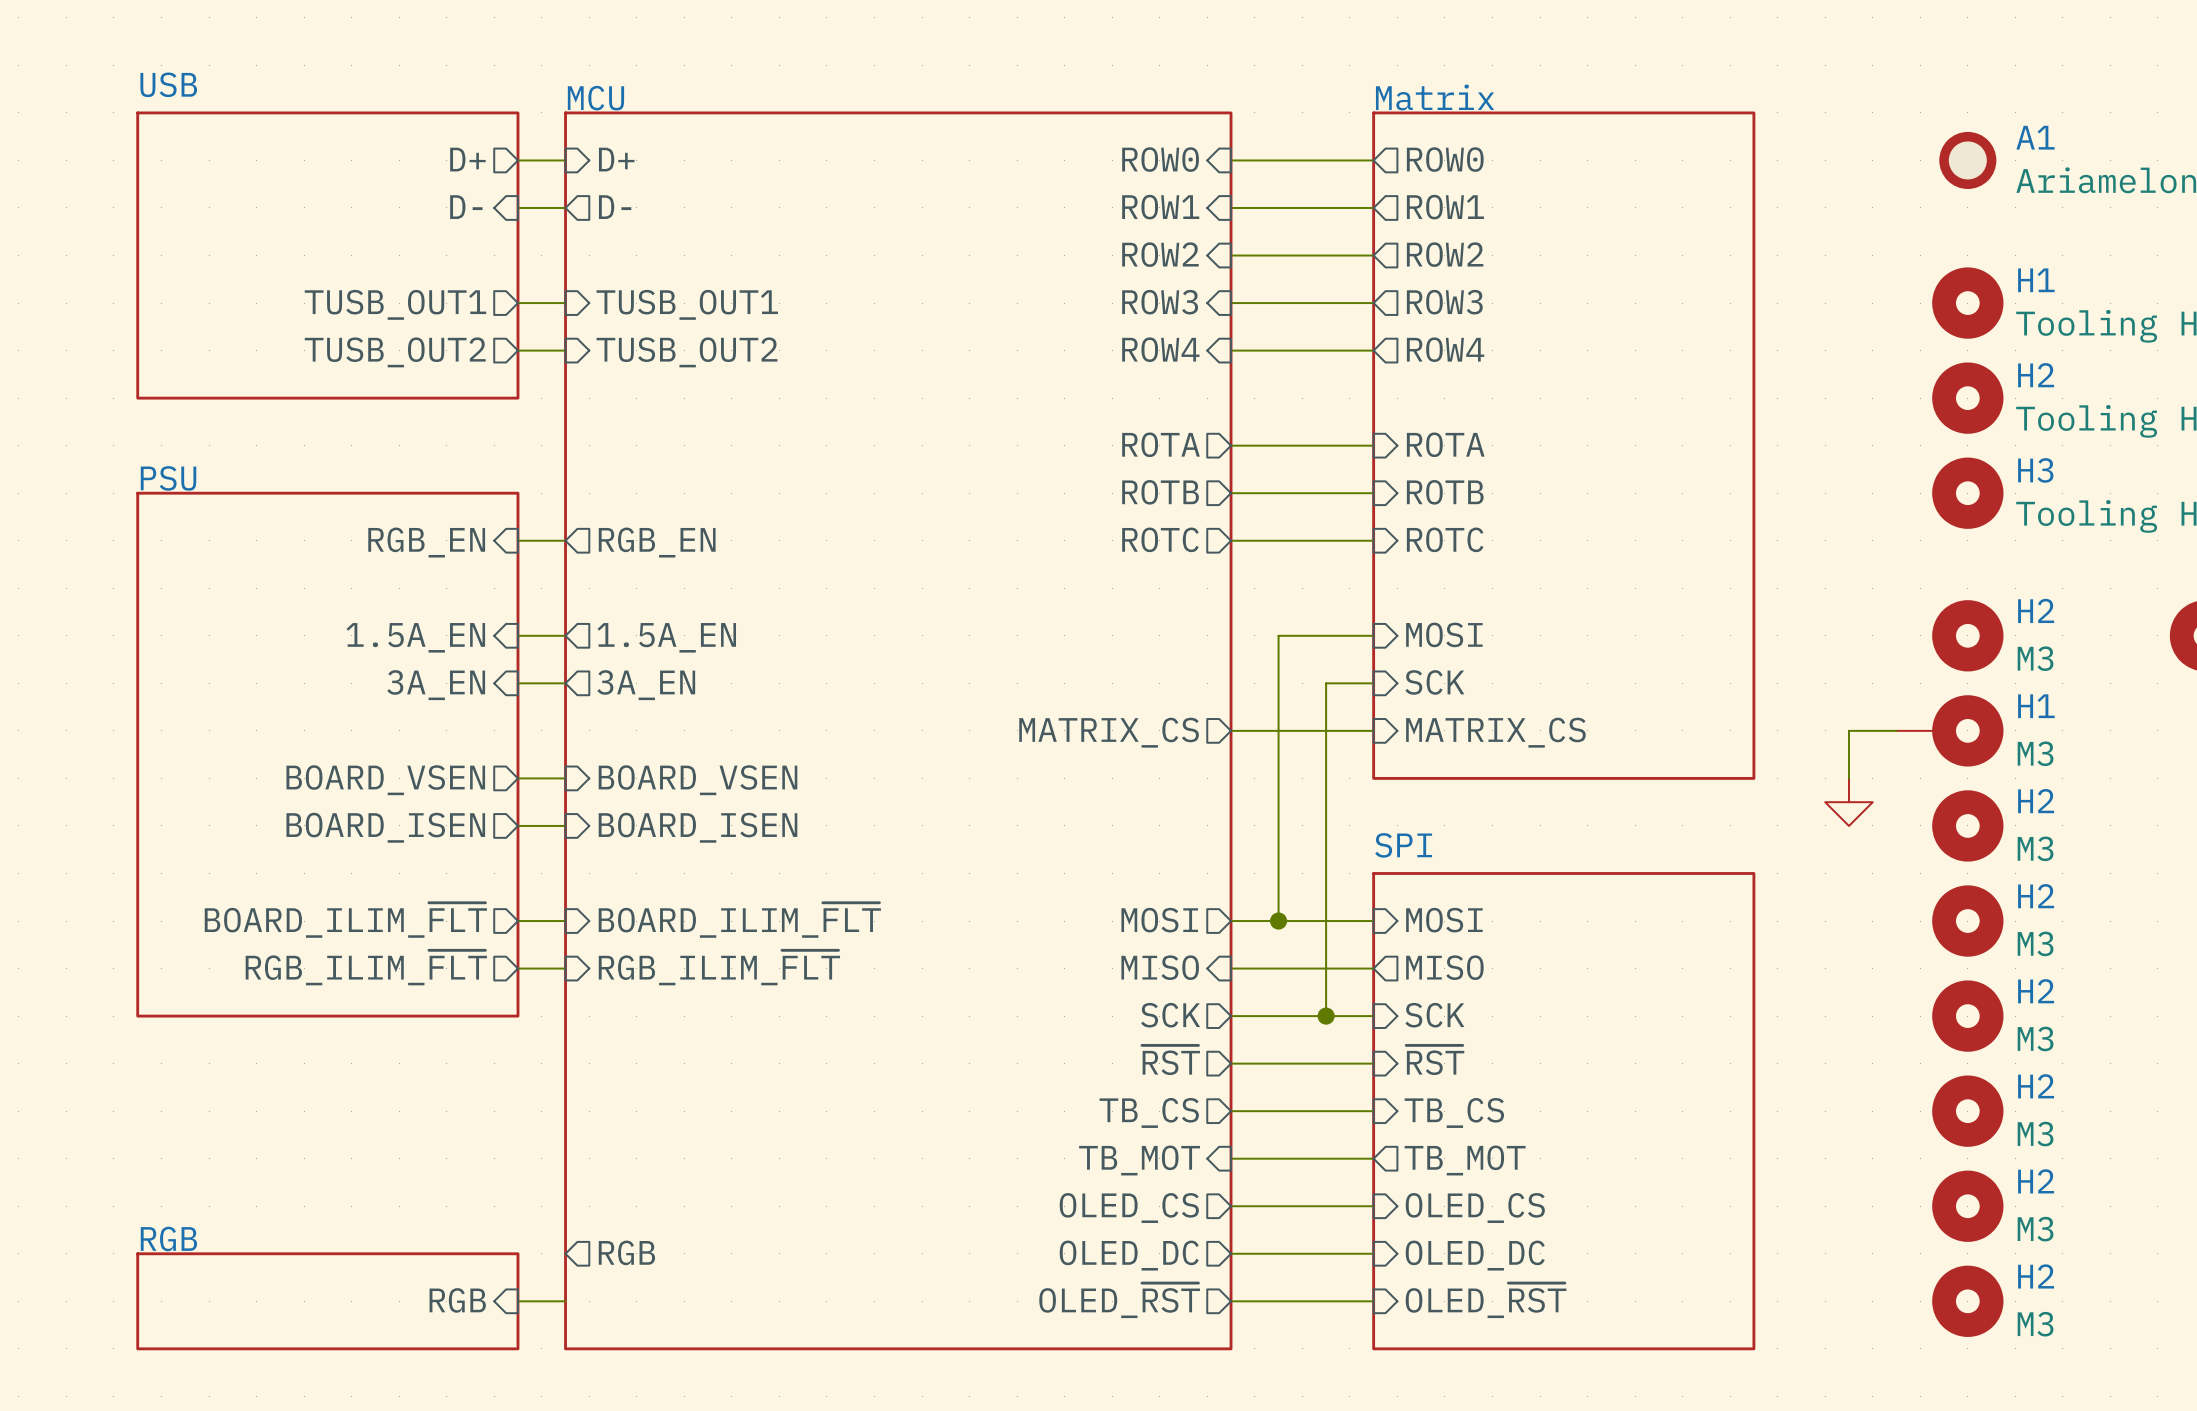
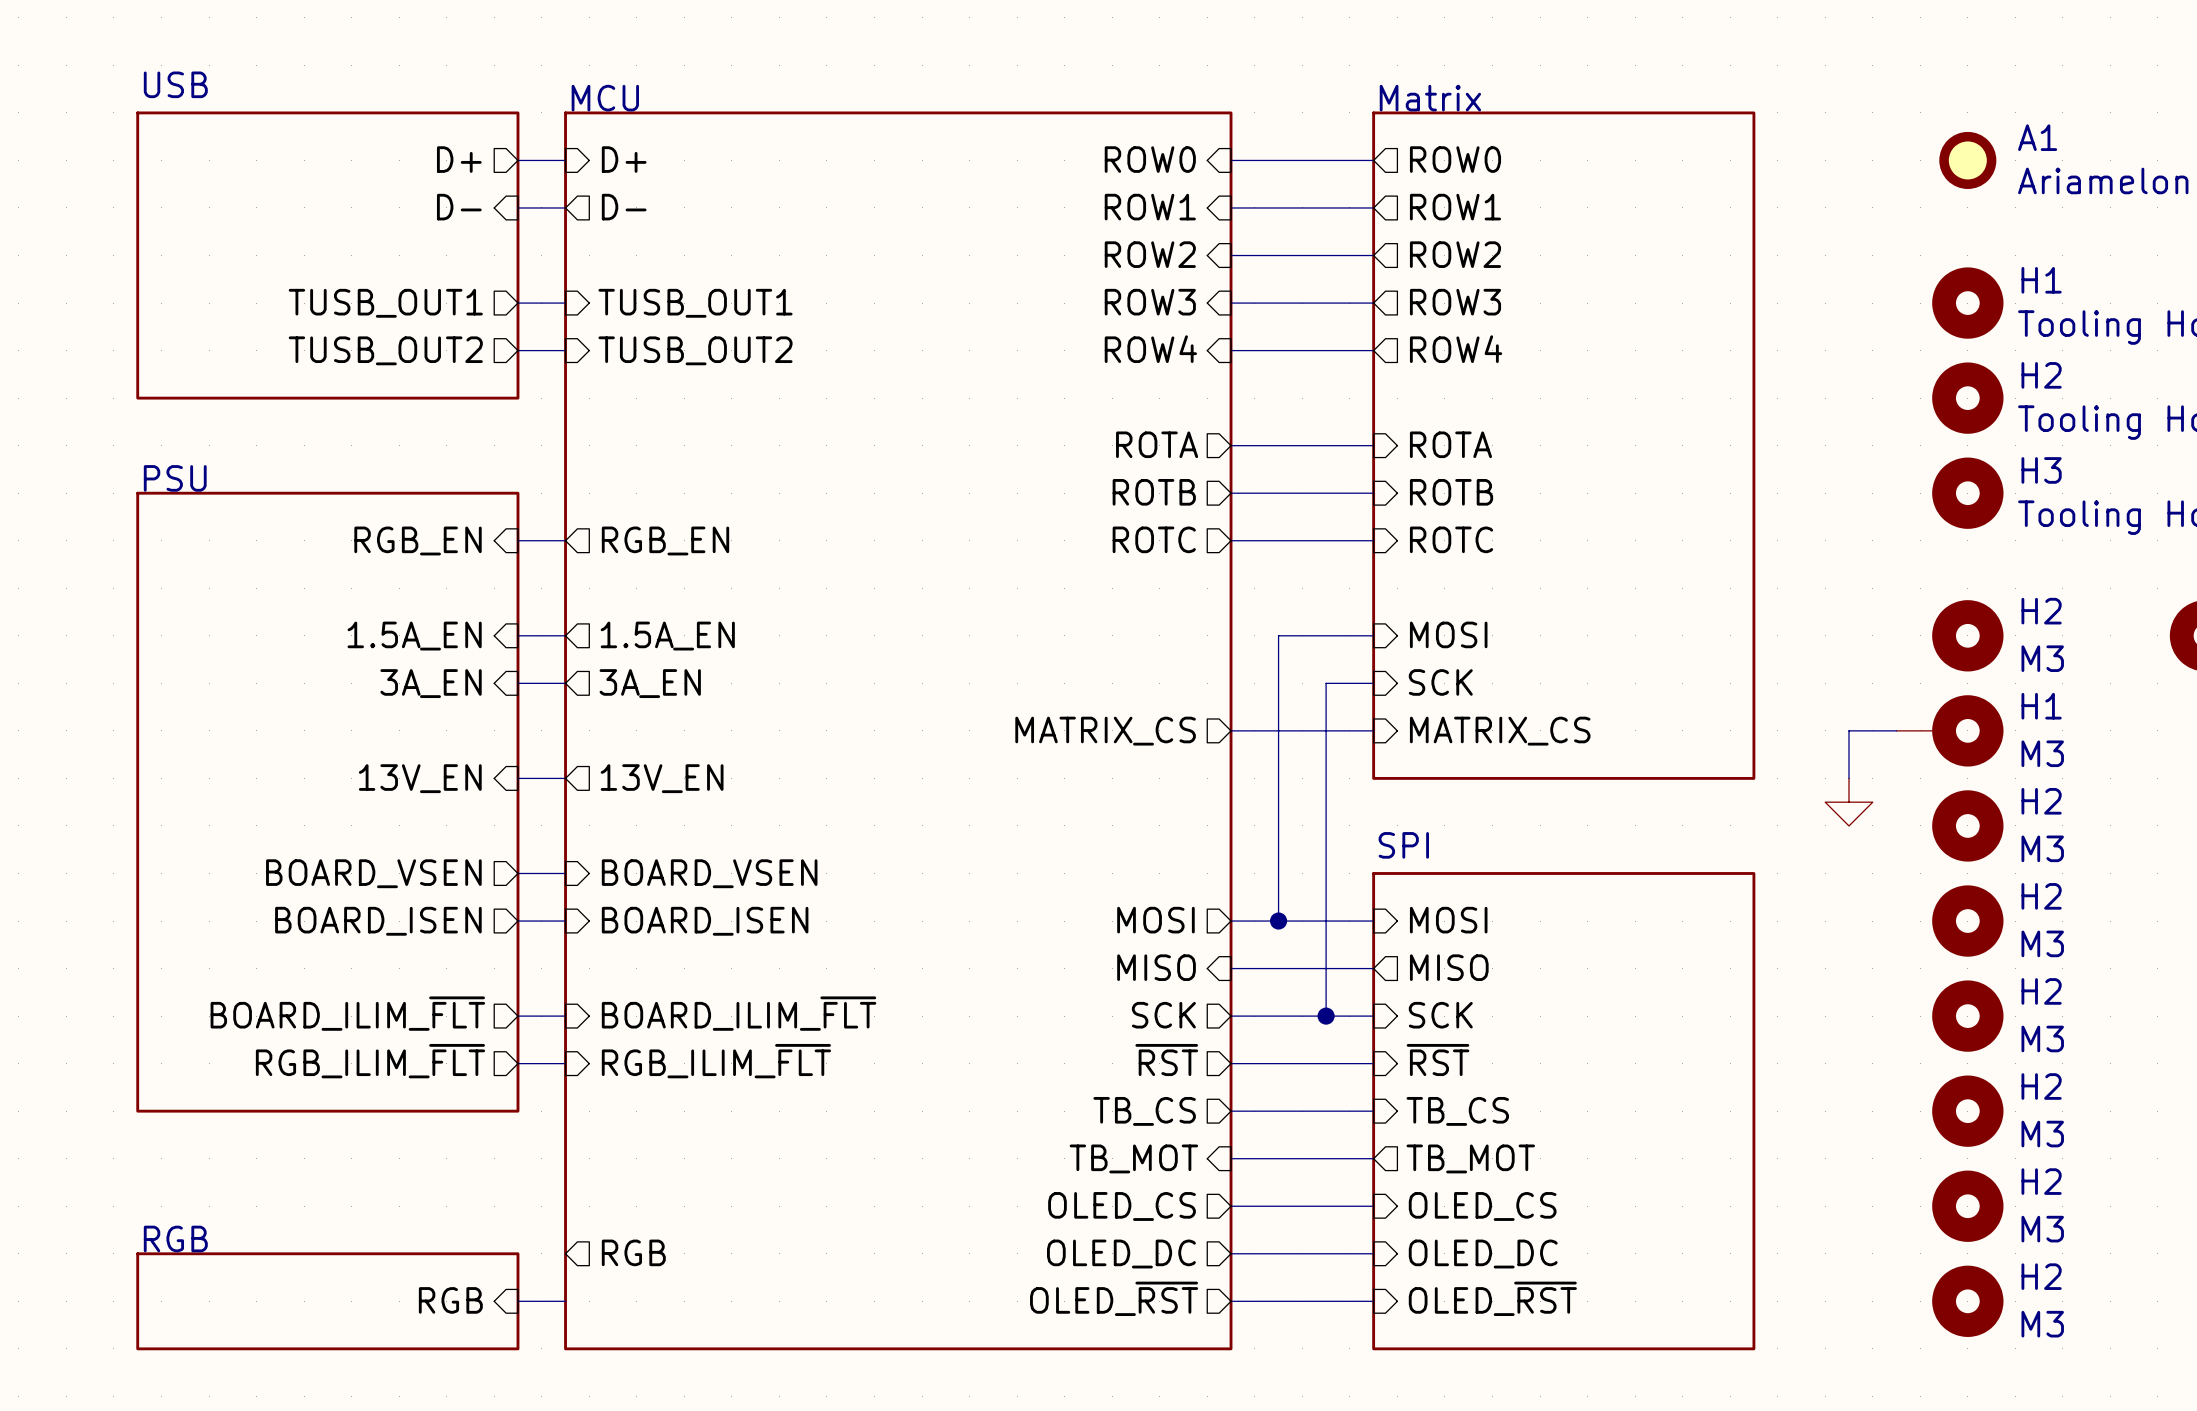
sheet PSU: (327, 754) -> none
sheet pin shape: output (385, 780) -> input (420, 778)
sheet pin: BOARD_VSEN (385, 780) -> 13V_EN (420, 778)
sheet pin shape: input (698, 780) -> output (662, 778)
sheet pin: BOARD_VSEN (698, 780) -> 13V_EN (662, 778)
sheet PSU: none -> (327, 802)
wire: (517, 825) (565, 825) -> (517, 873) (565, 873)
sheet pin: BOARD_ISEN (385, 827) -> BOARD_VSEN (373, 873)
sheet pin: BOARD_ISEN (698, 827) -> BOARD_VSEN (709, 873)
sheet pin: BOARD_ILIM_~{FLT} (345, 920) -> BOARD_ISEN (378, 921)
sheet pin: BOARD_ILIM_~{FLT} (739, 920) -> BOARD_ISEN (705, 921)
sheet pin: RGB_ILIM_~{FLT} (366, 967) -> BOARD_ILIM_~{FLT} (347, 1013)
sheet pin: RGB_ILIM_~{FLT} (719, 967) -> BOARD_ILIM_~{FLT} (739, 1013)
wire: (517, 968) (565, 968) -> (517, 1016) (565, 1016)
sheet pin: none -> RGB_ILIM_~{FLT} (370, 1061)
sheet pin: none -> RGB_ILIM_~{FLT} (716, 1061)
wire: none -> (517, 1063) (565, 1063)

